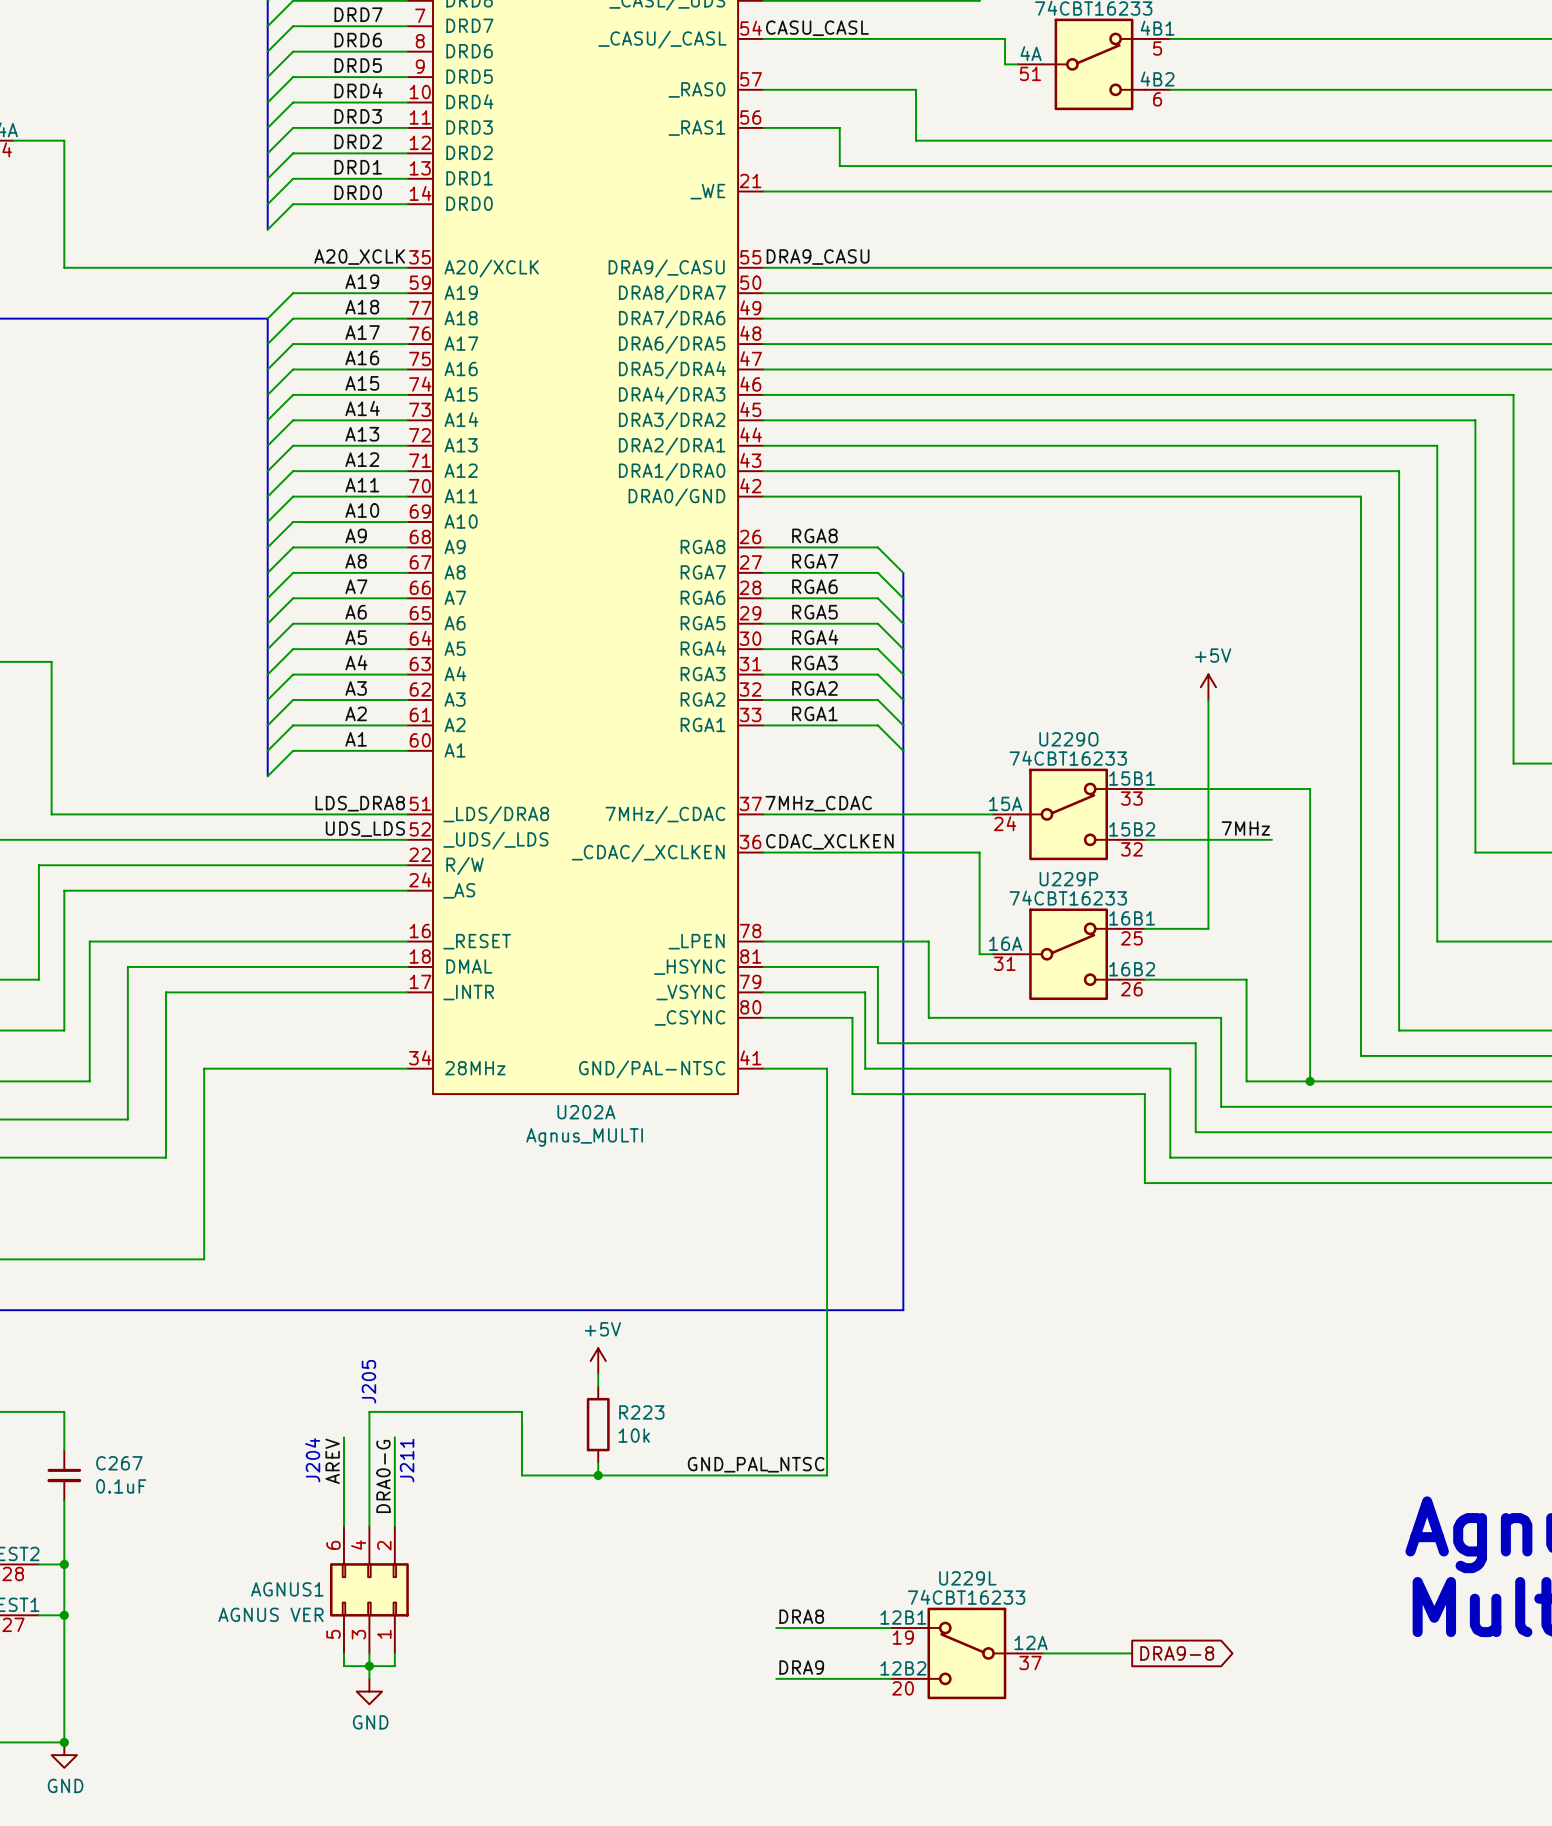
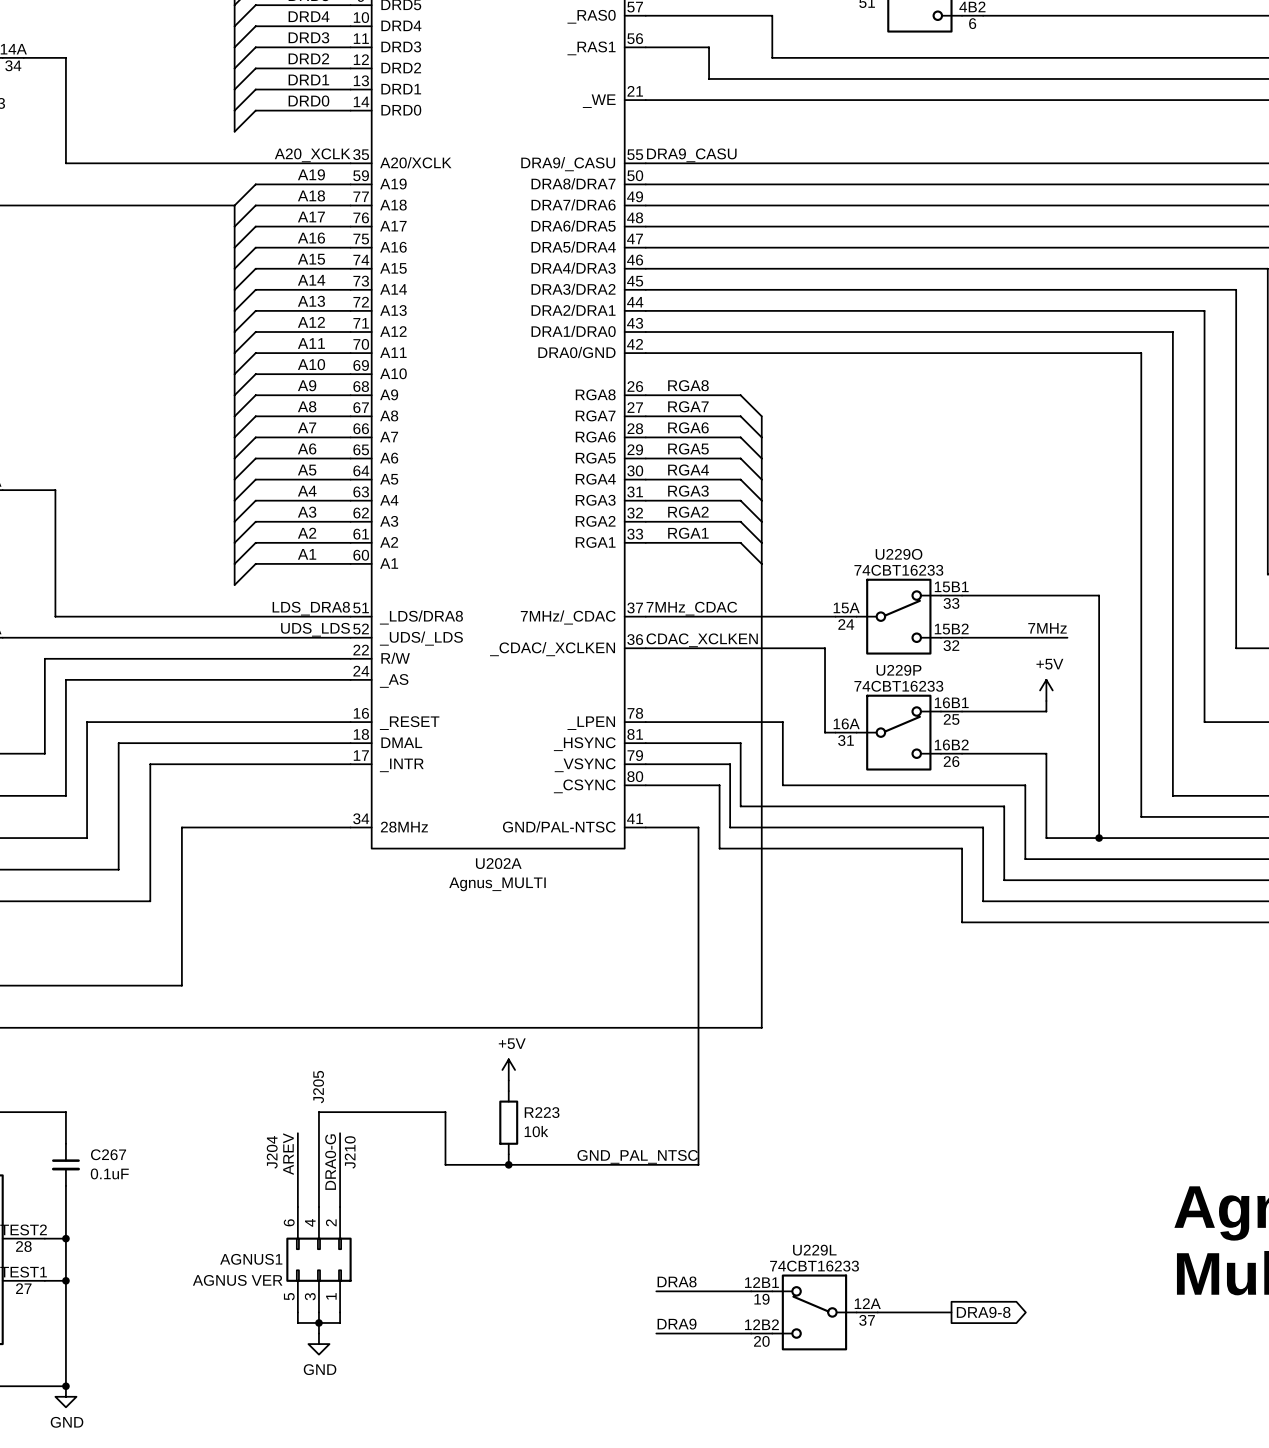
power symbol position: +5V (1208, 687) -> +5V (1046, 690)
wire: (1208, 700) (1208, 928) -> (1046, 700) (1046, 711) (1014, 711)
text: J211 (407, 1460) -> J210 (350, 1152)

